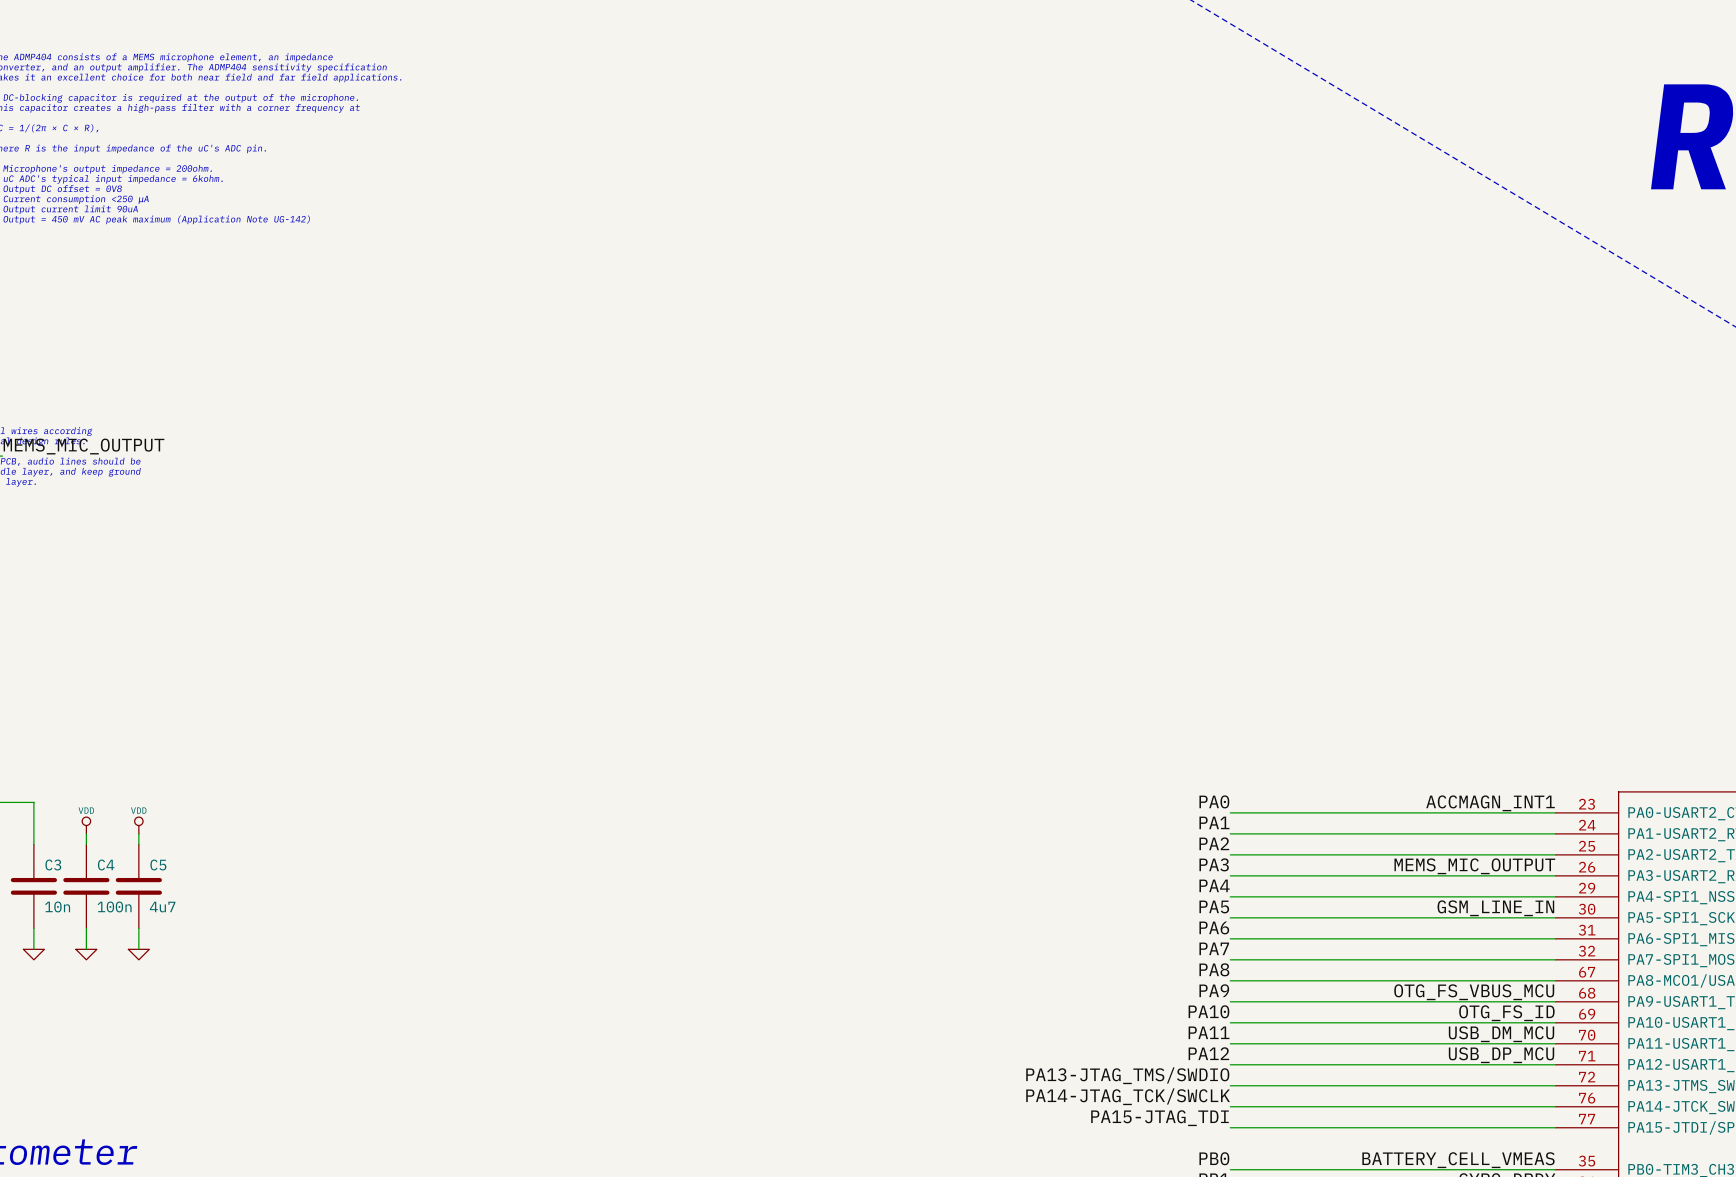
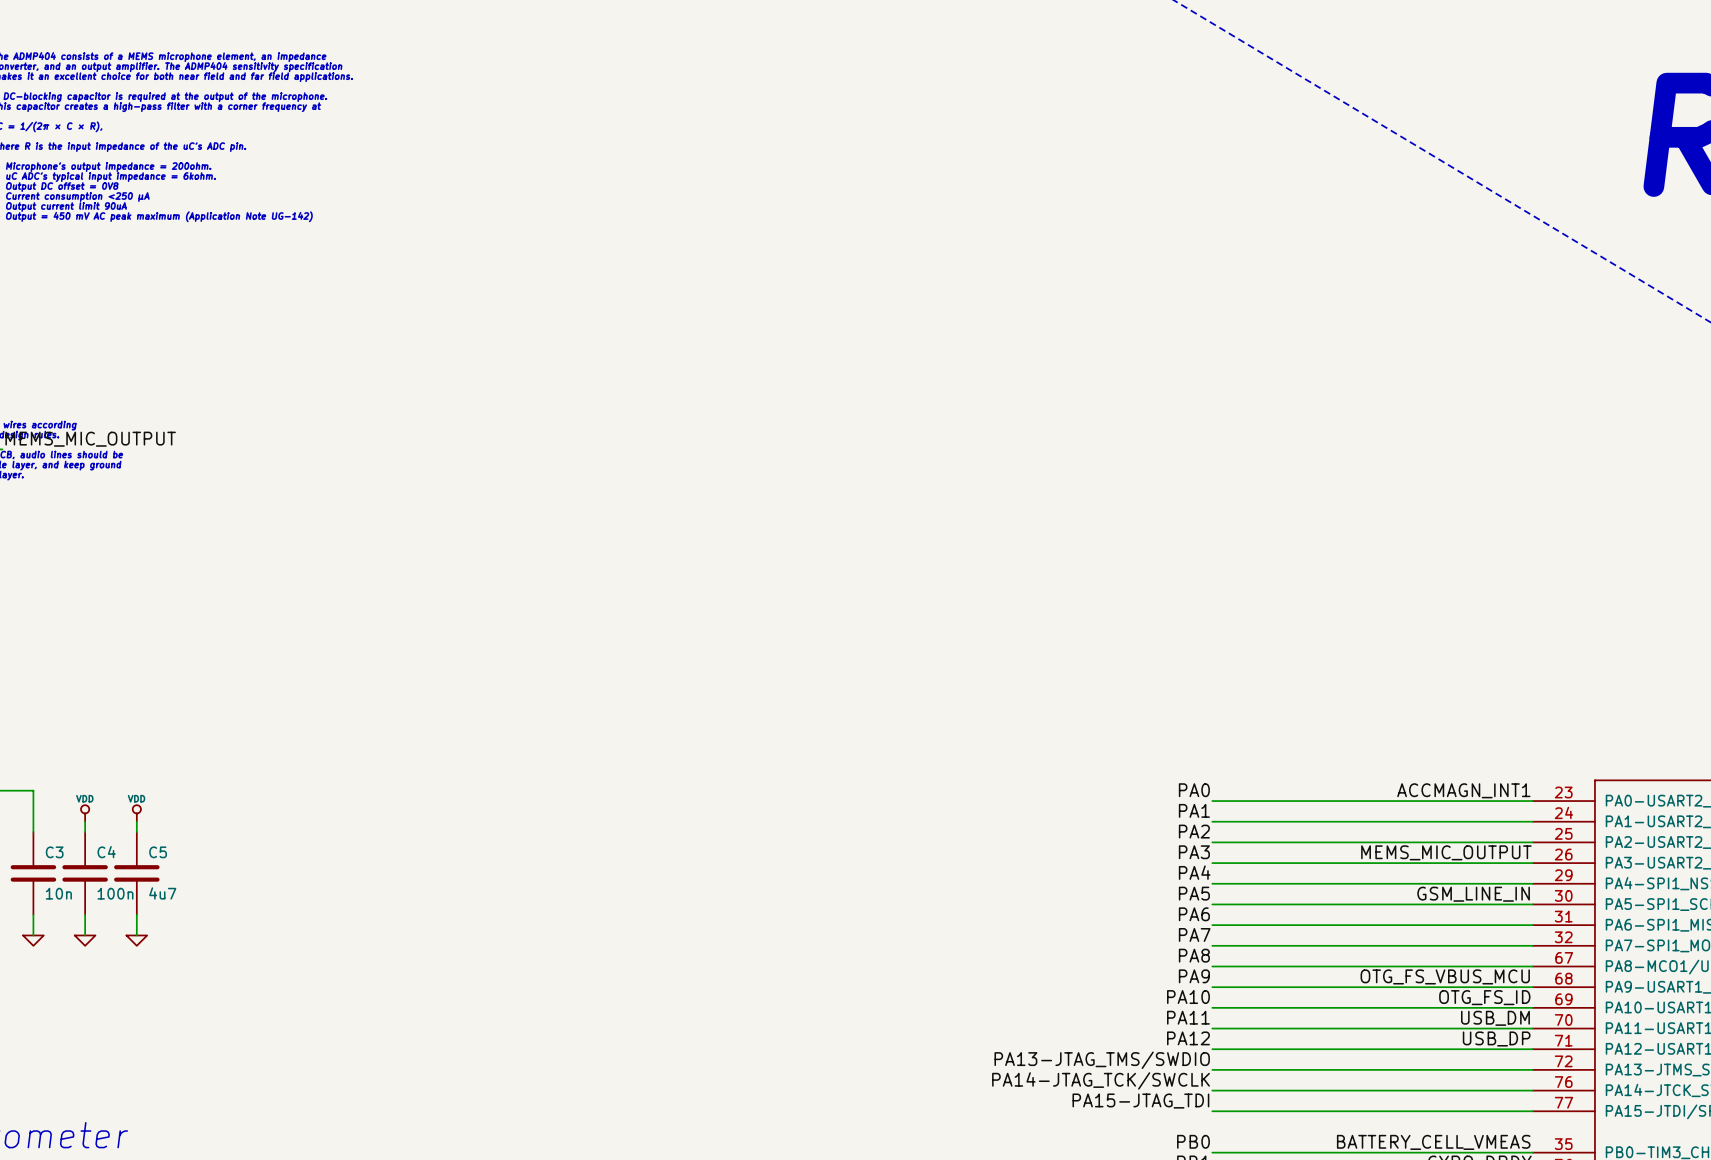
label: USB_DM_MCU (1501, 1034) -> USB_DM (1495, 1018)
label: USB_DP_MCU (1501, 1055) -> USB_DP (1496, 1038)

